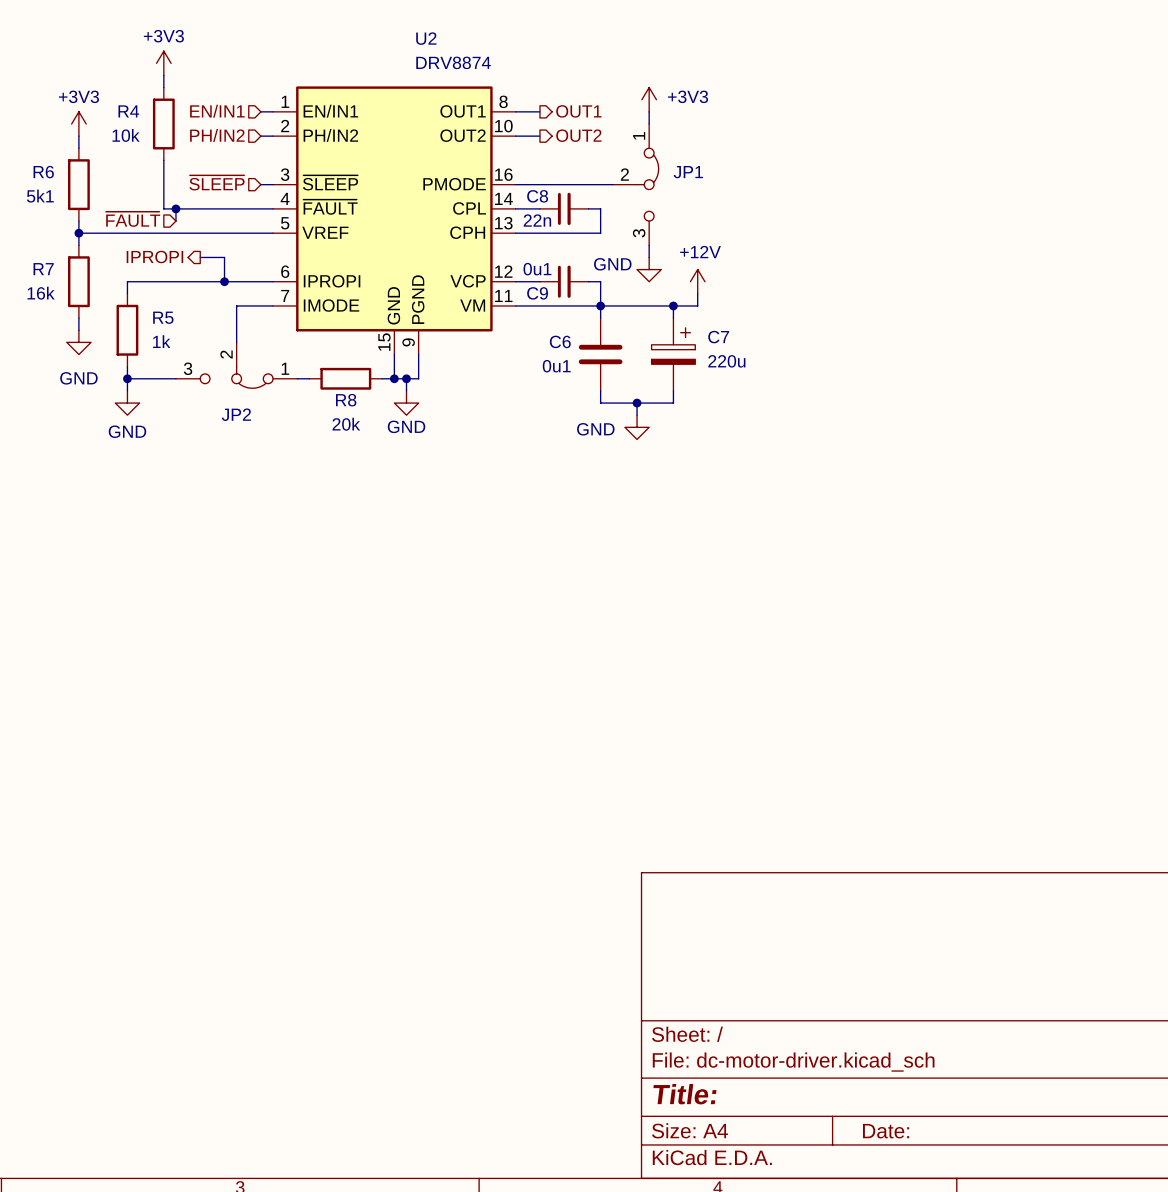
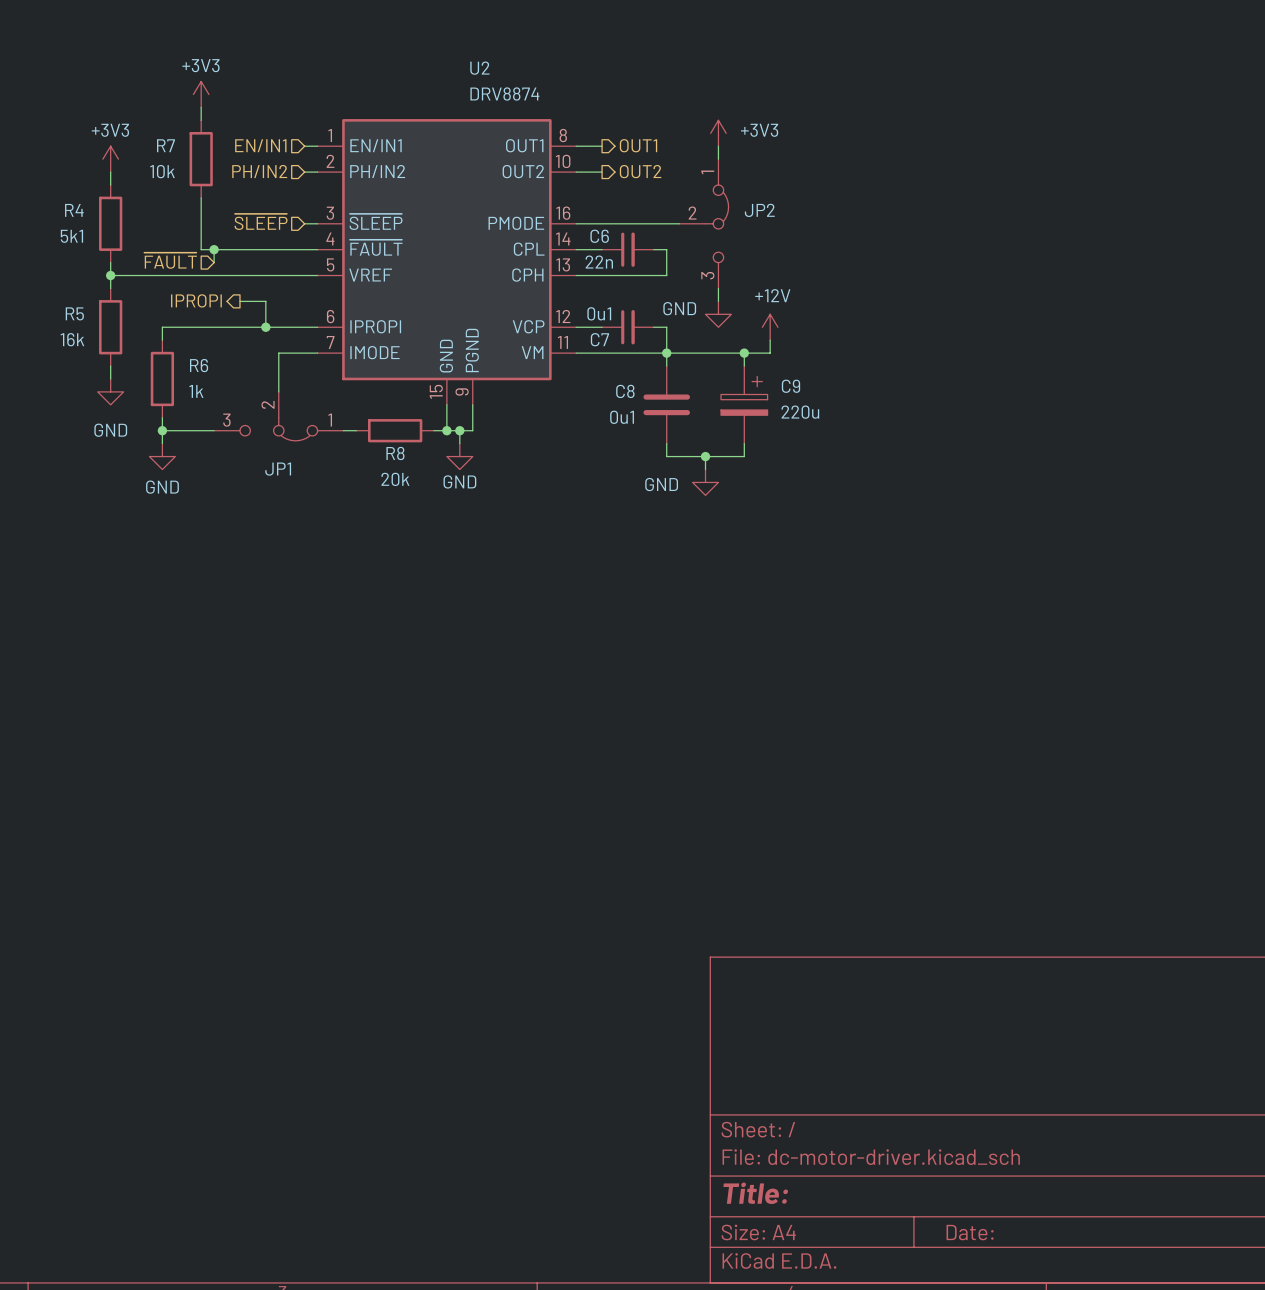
R4 name: R4 (128, 111) -> R7 (165, 145)
R6 name: R6 (43, 172) -> R4 (74, 210)
JP1 name: JP1 (688, 172) -> JP2 (759, 210)
C8 name: C8 (537, 196) -> C6 (599, 236)
R7 name: R7 (43, 269) -> R5 (74, 313)
C9 name: C9 (537, 293) -> C7 (599, 339)
R5 name: R5 (163, 317) -> R6 (199, 365)
C7 name: C7 (718, 337) -> C9 (791, 386)
C6 name: C6 (560, 341) -> C8 (625, 391)
JP2 name: JP2 (236, 414) -> JP1 (278, 469)

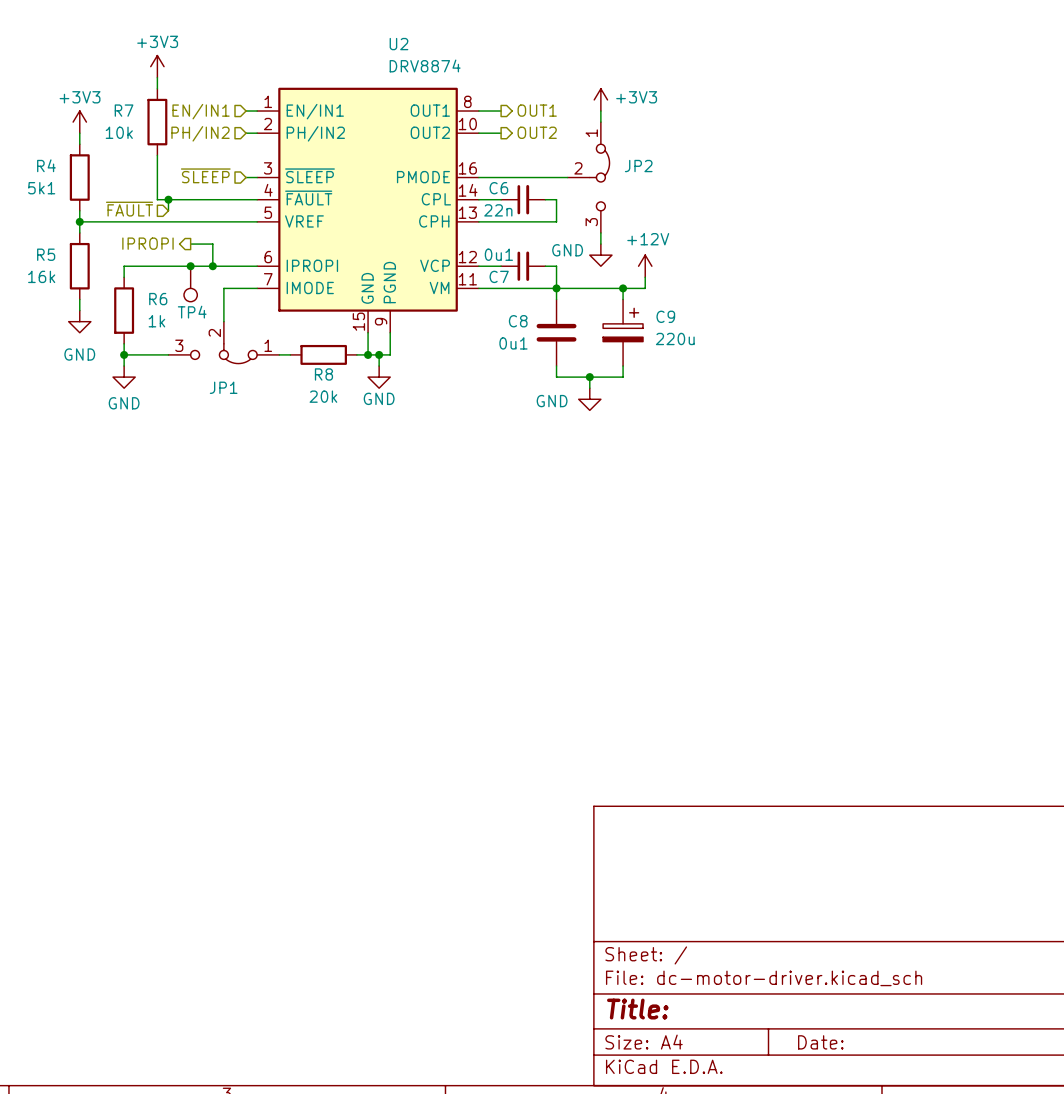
junction: none -> (190, 266)
TP4: none -> (190, 283)

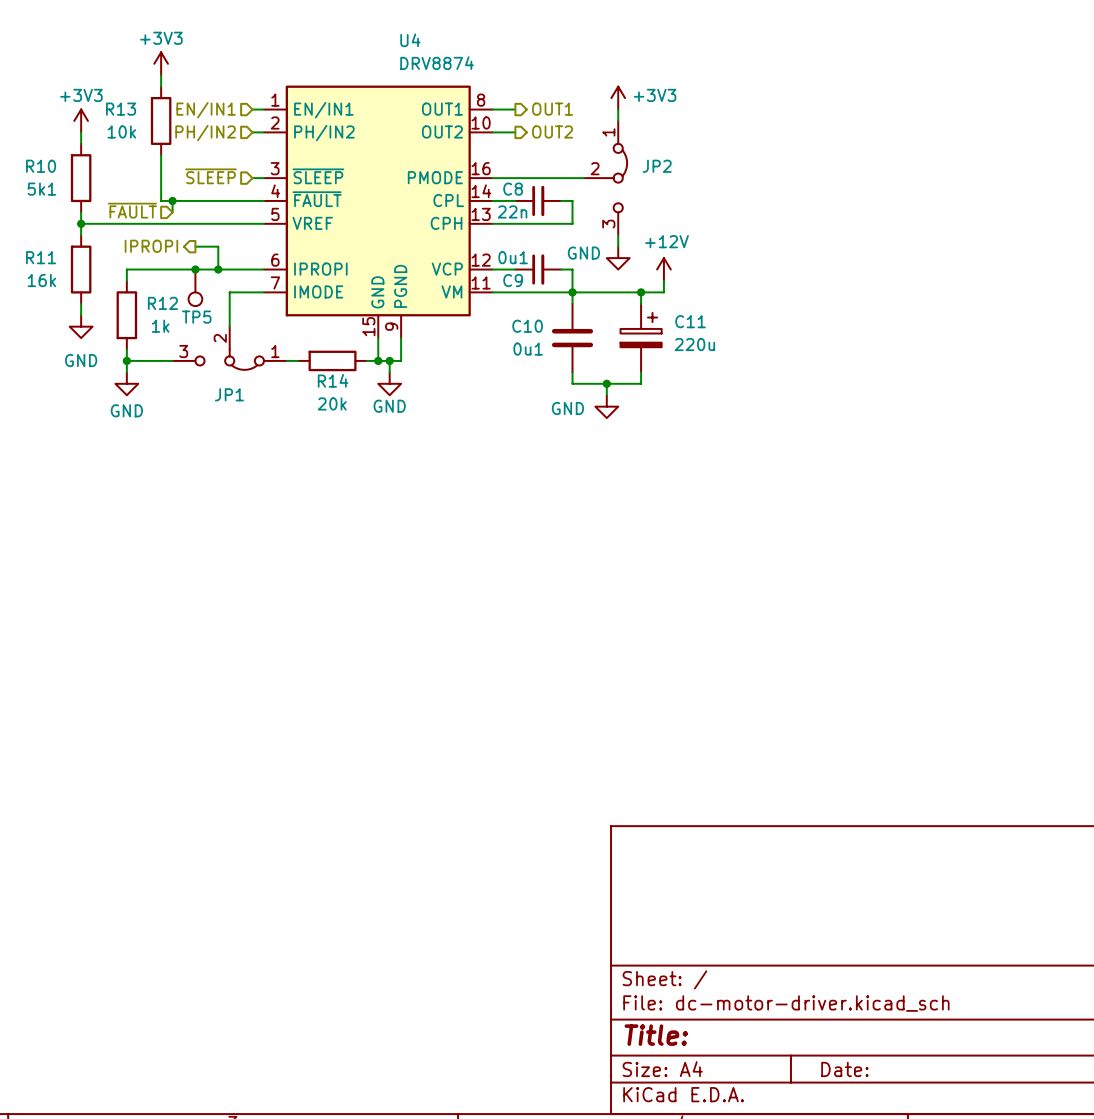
U2 name: U2 (398, 44) -> U4 (410, 40)
R7 name: R7 (124, 110) -> R13 (121, 109)
R4 name: R4 (46, 165) -> R10 (41, 166)
C6 name: C6 (498, 188) -> C8 (513, 189)
R5 name: R5 (46, 254) -> R11 (41, 257)
C7 name: C7 (499, 276) -> C9 (513, 280)
R6 name: R6 (158, 299) -> R12 (162, 303)
TP4 name: TP4 (192, 312) -> TP5 (196, 317)
C9 name: C9 (665, 316) -> C11 (690, 321)
C8 name: C8 (518, 321) -> C10 (527, 326)
R8 name: R8 (323, 374) -> R14 (333, 380)

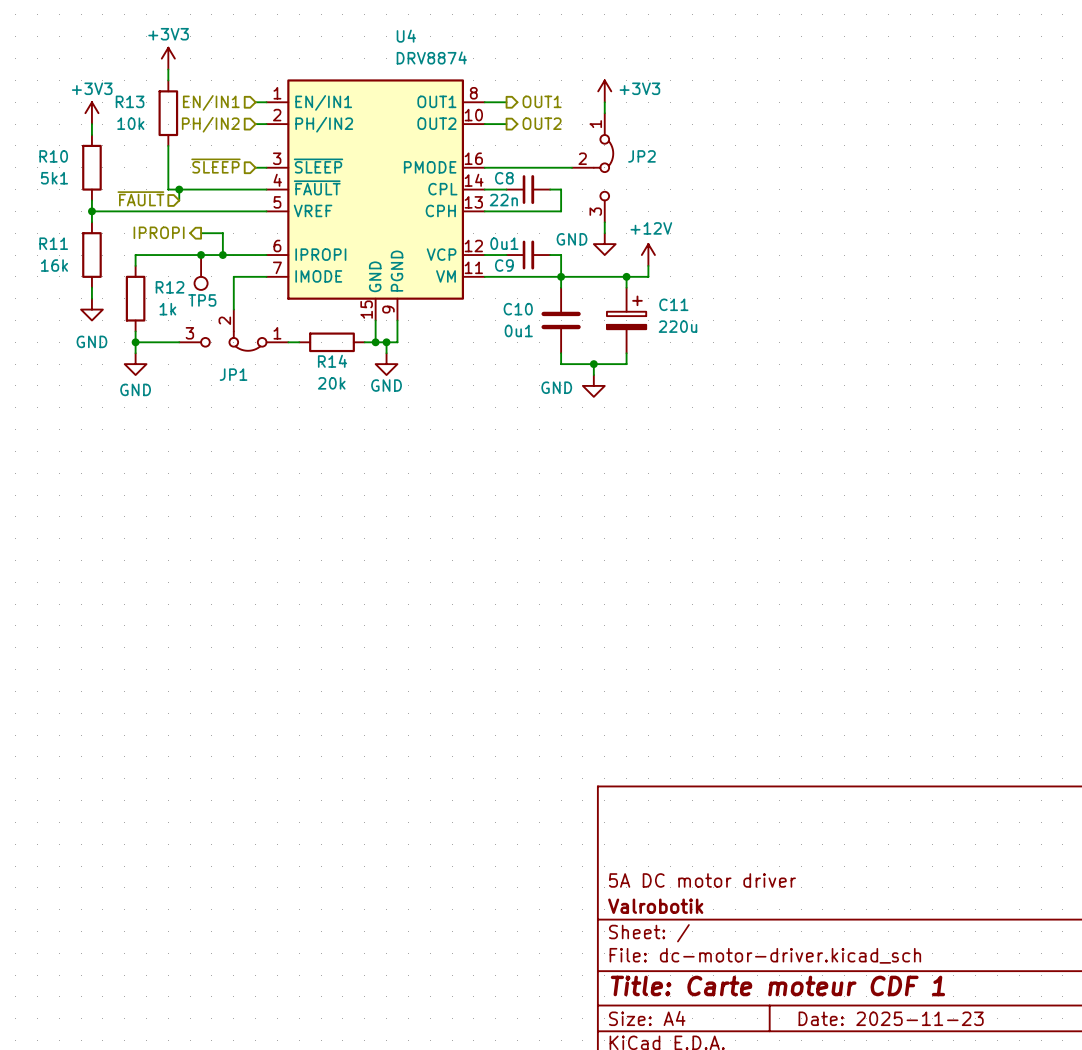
title block: none -> 5A DC motor driver (702, 880)
title block: none -> Valrobotik (655, 906)
title block: Title: (656, 1035) -> Title: Carte moteur CDF 1 (777, 985)
title block: Date: (844, 1069) -> Date: 2025-11-23 (891, 1018)

